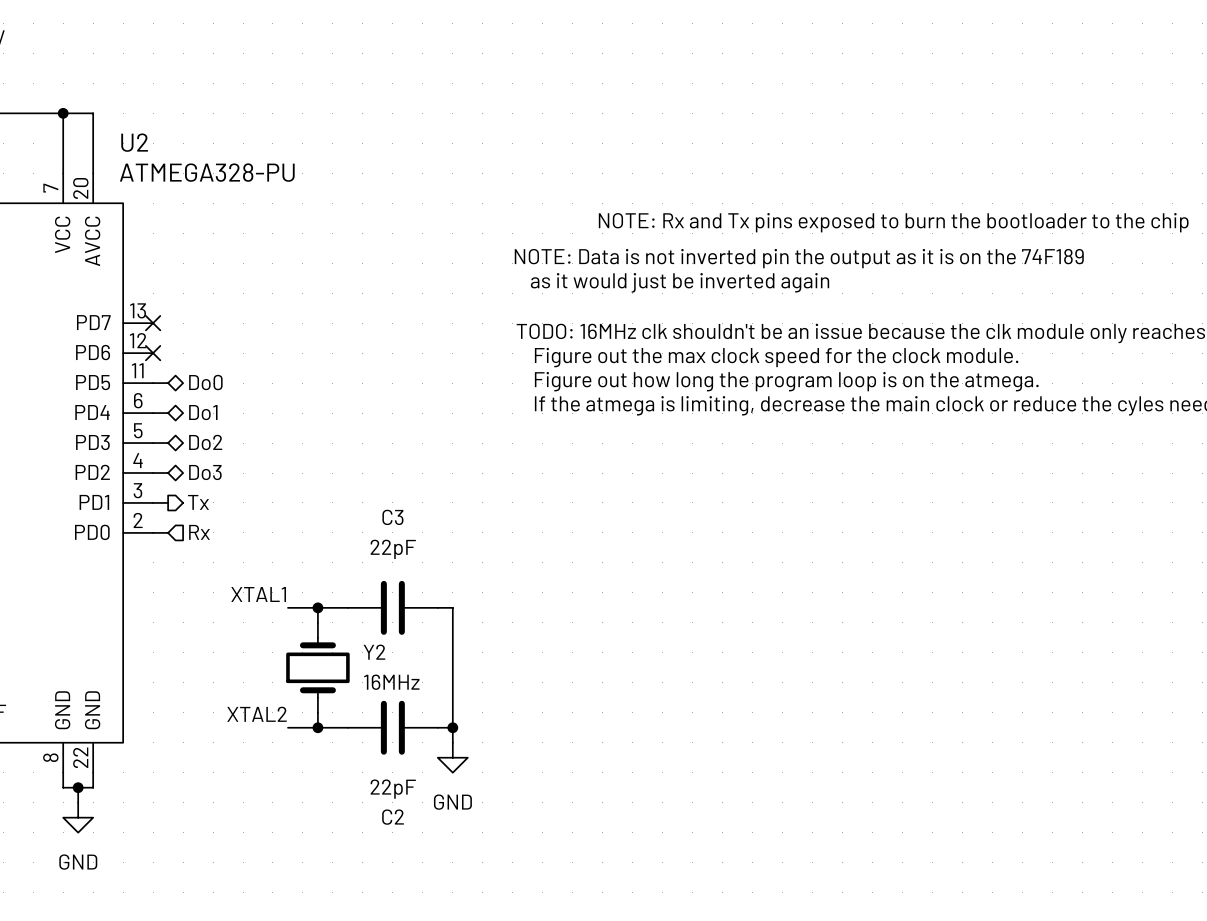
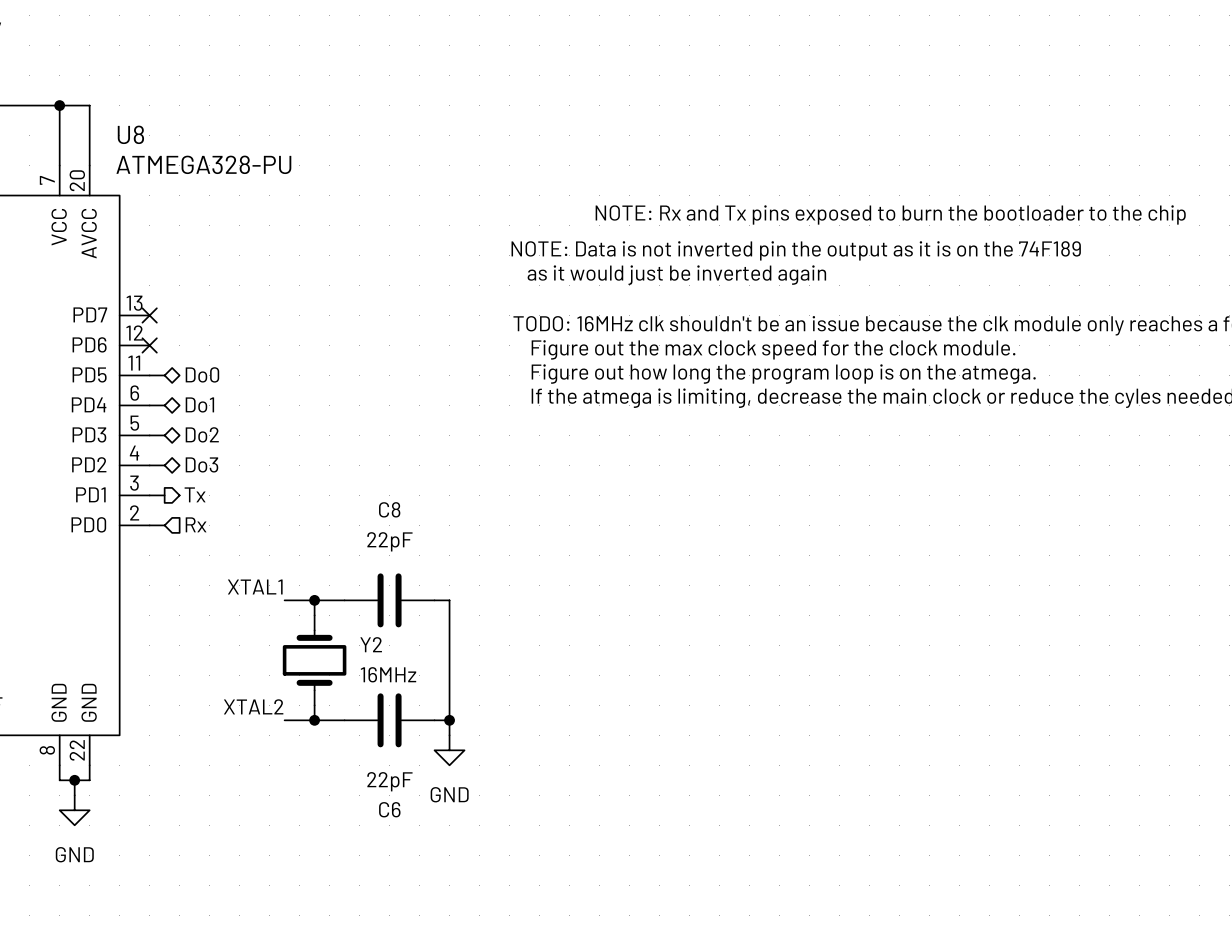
U2 name: U2 (134, 142) -> U8 (130, 134)
C3 name: C3 (392, 517) -> C8 (389, 509)
C2 name: C2 (393, 817) -> C6 (389, 809)

